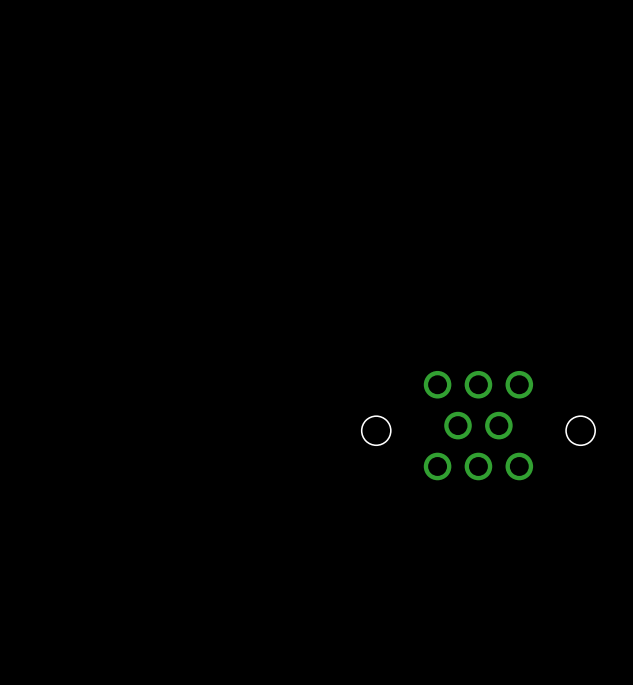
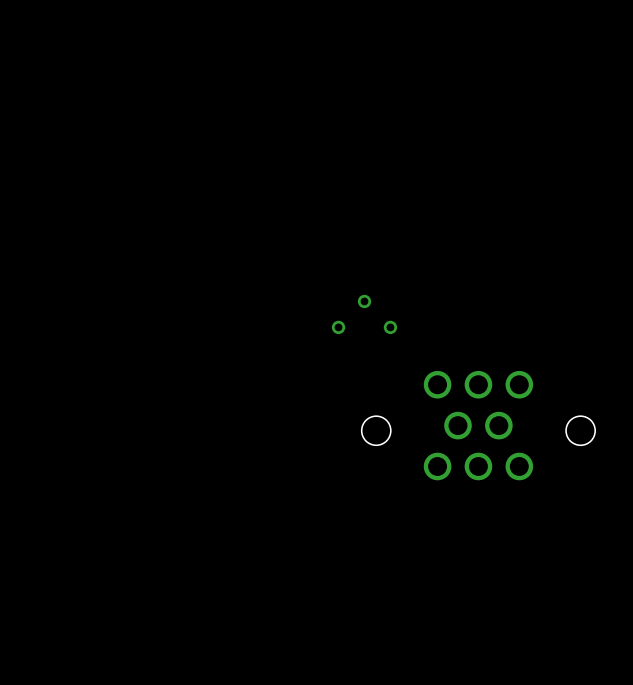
part: none -> (364, 314)

